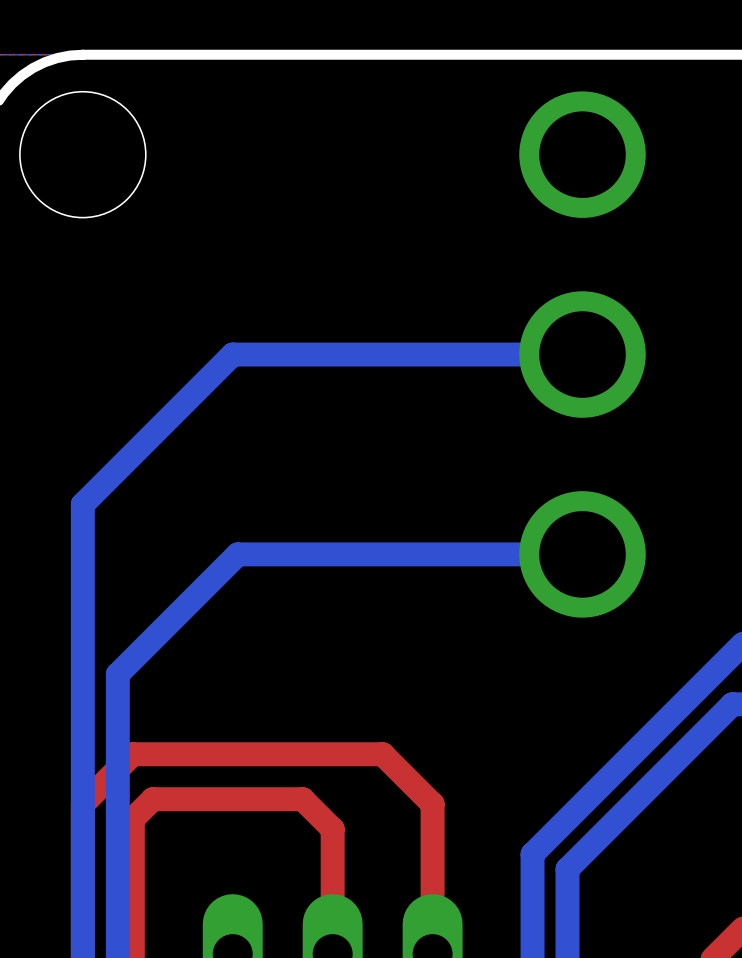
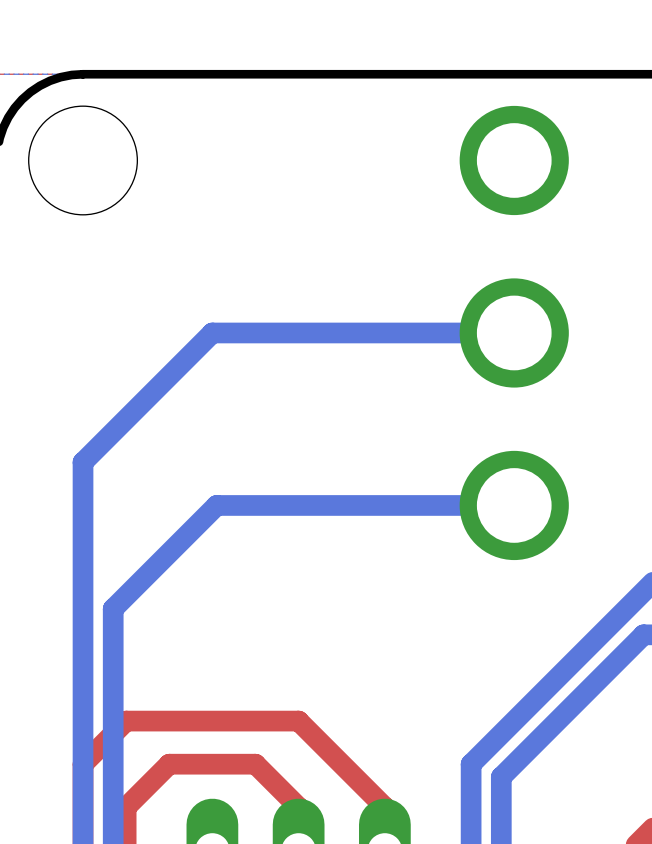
top track: (82, 854) (82, 804) (132, 754) (382, 754) (432, 804) (432, 904) -> (83, 764) (126, 721) (298, 721) (384, 807)
top track: (332, 904) (332, 829) (302, 799) (152, 799) (132, 819) (132, 904) -> (298, 807) (255, 764) (169, 764) (126, 807)

